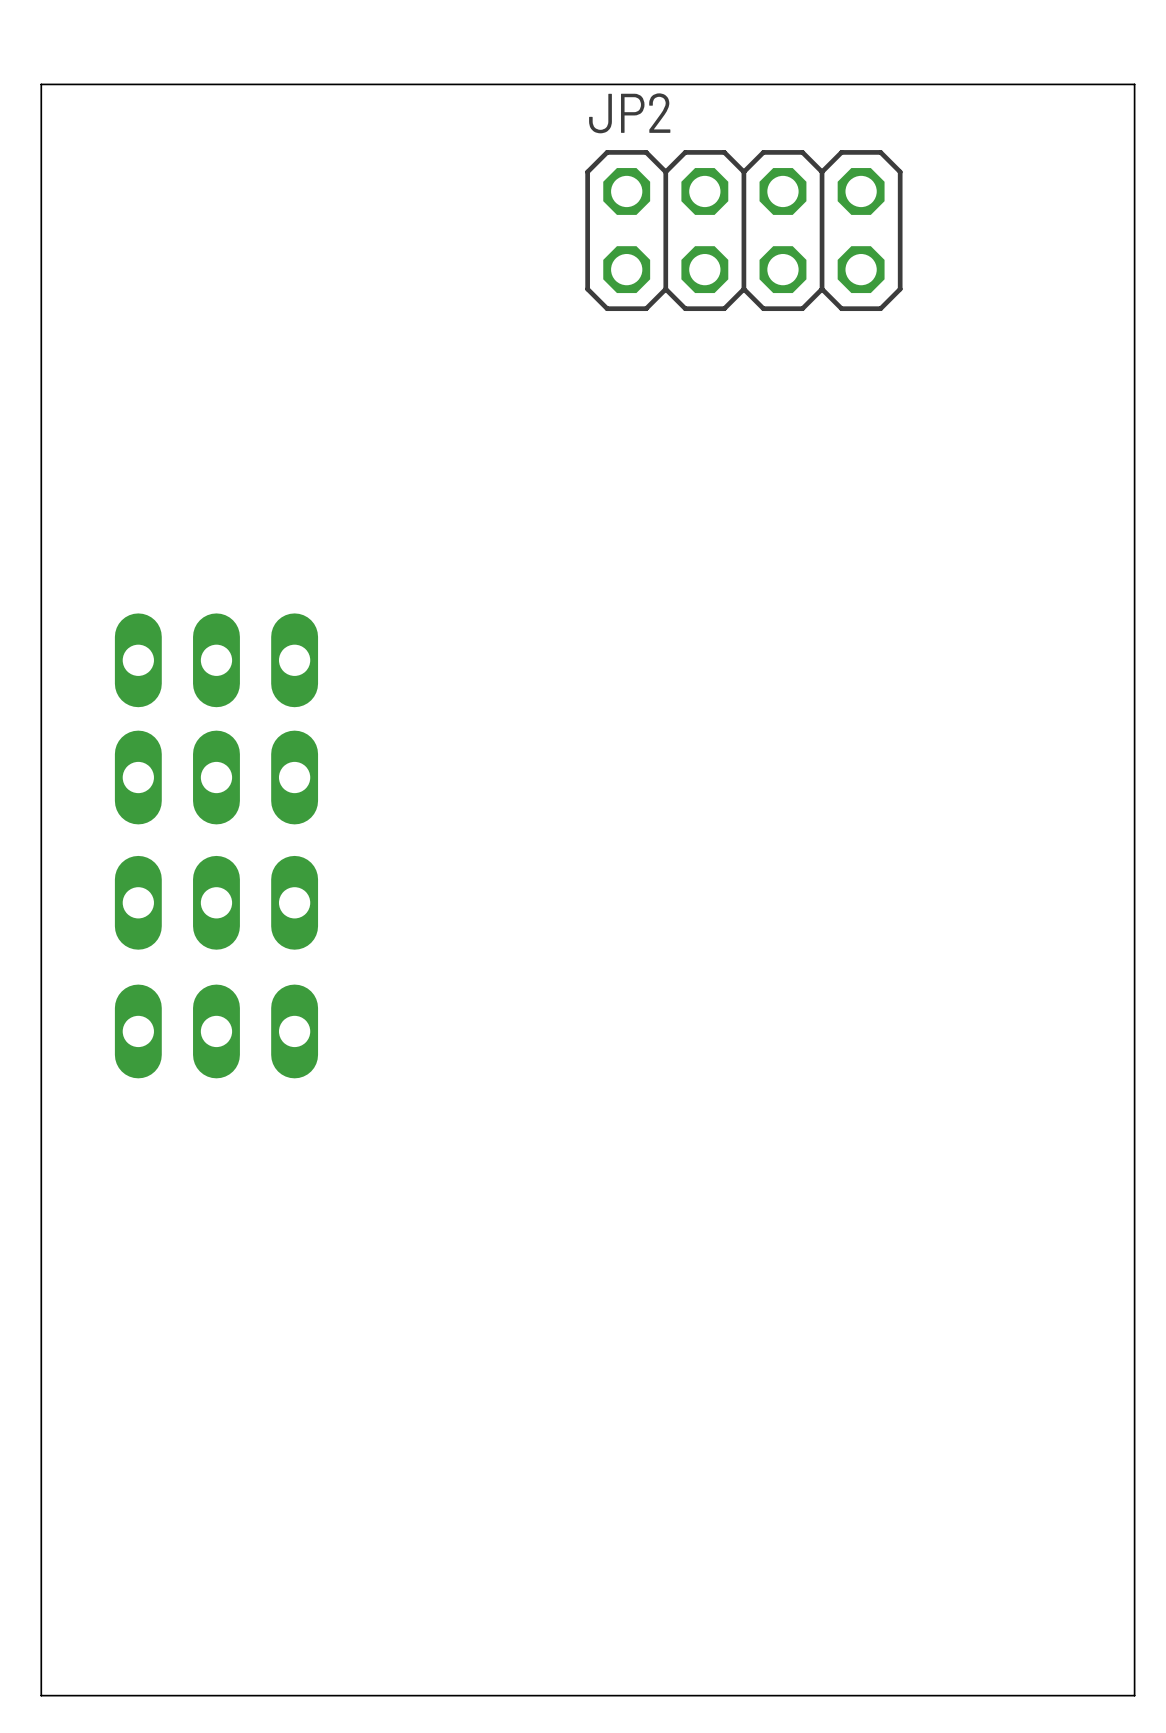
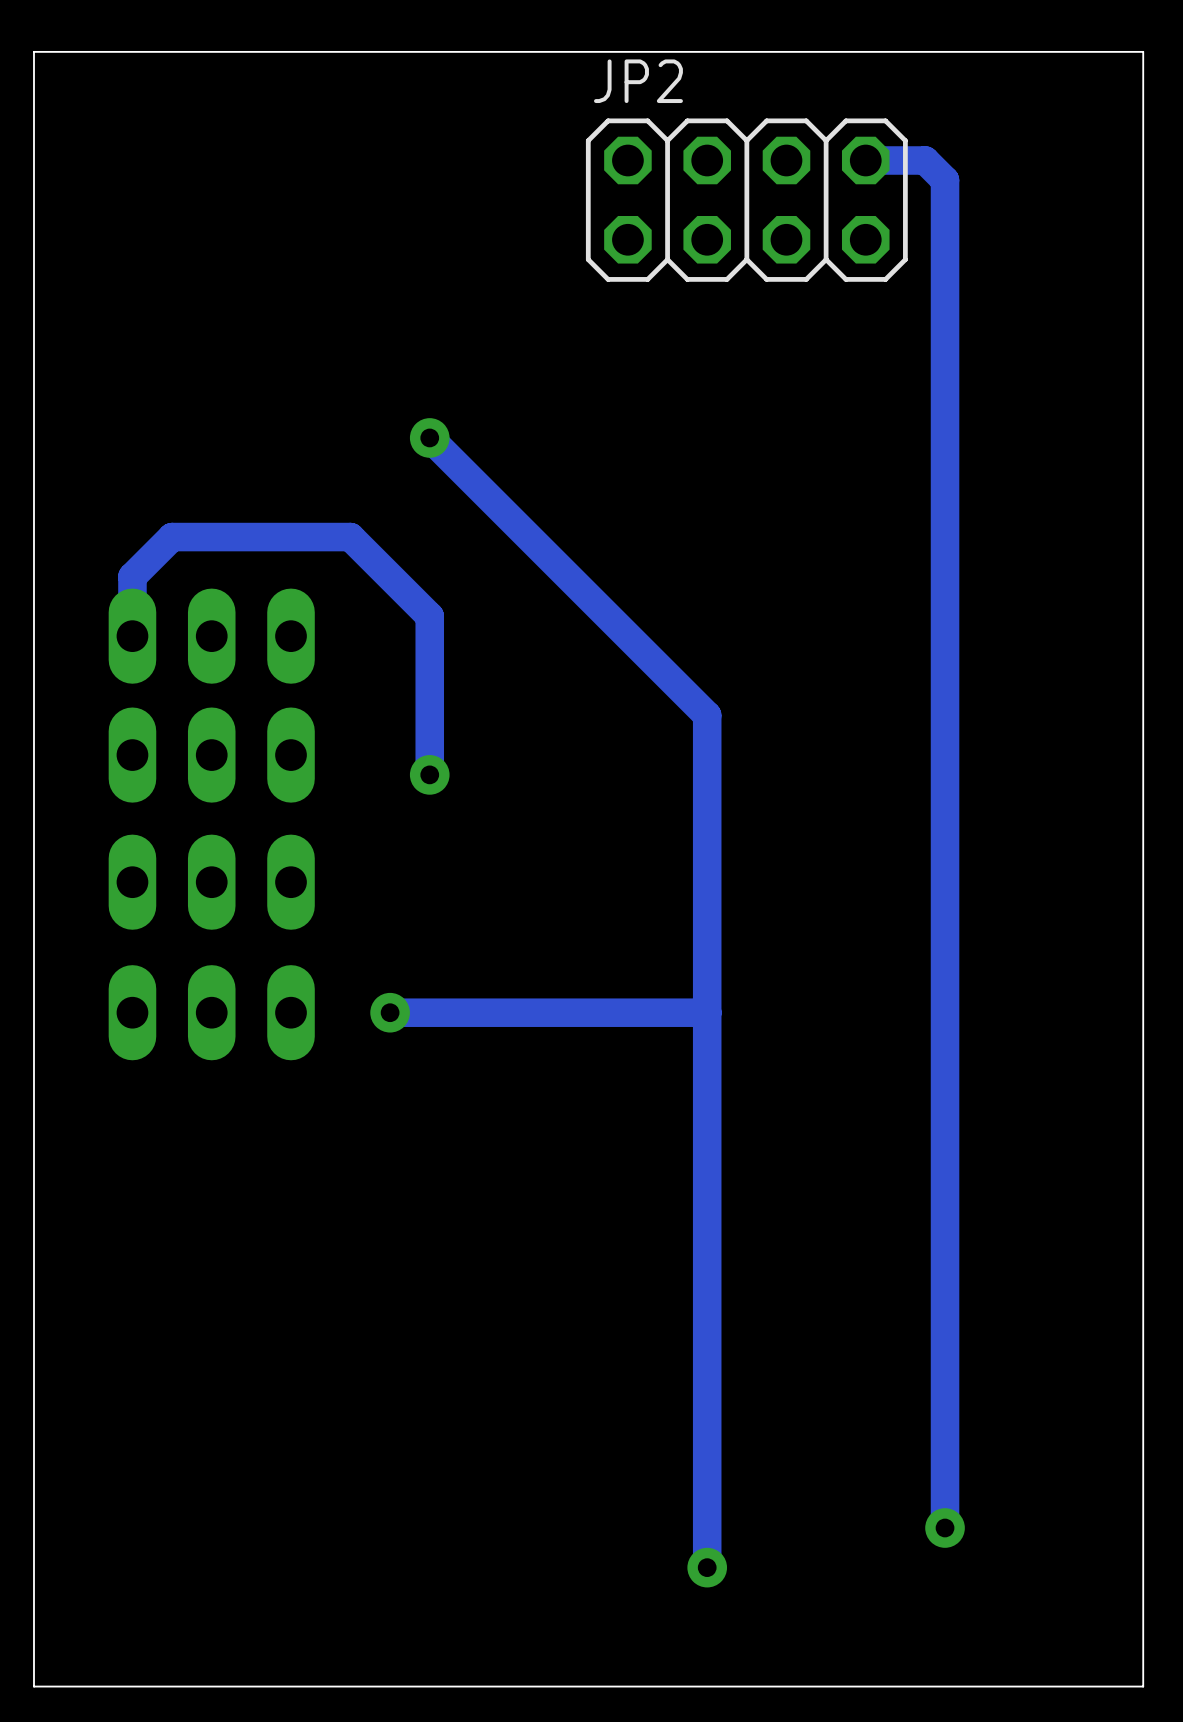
track: none -> (865, 160) (925, 160) (945, 180) (945, 1528)
track: none -> (429, 437) (707, 715) (707, 1567)
via: none -> (429, 437)
track: none -> (132, 636) (132, 576) (172, 537) (350, 537) (429, 616) (429, 774)
via: none -> (429, 774)
via: none -> (390, 1012)
track: none -> (707, 1012) (390, 1012)
via: none -> (945, 1528)
via: none -> (707, 1567)

